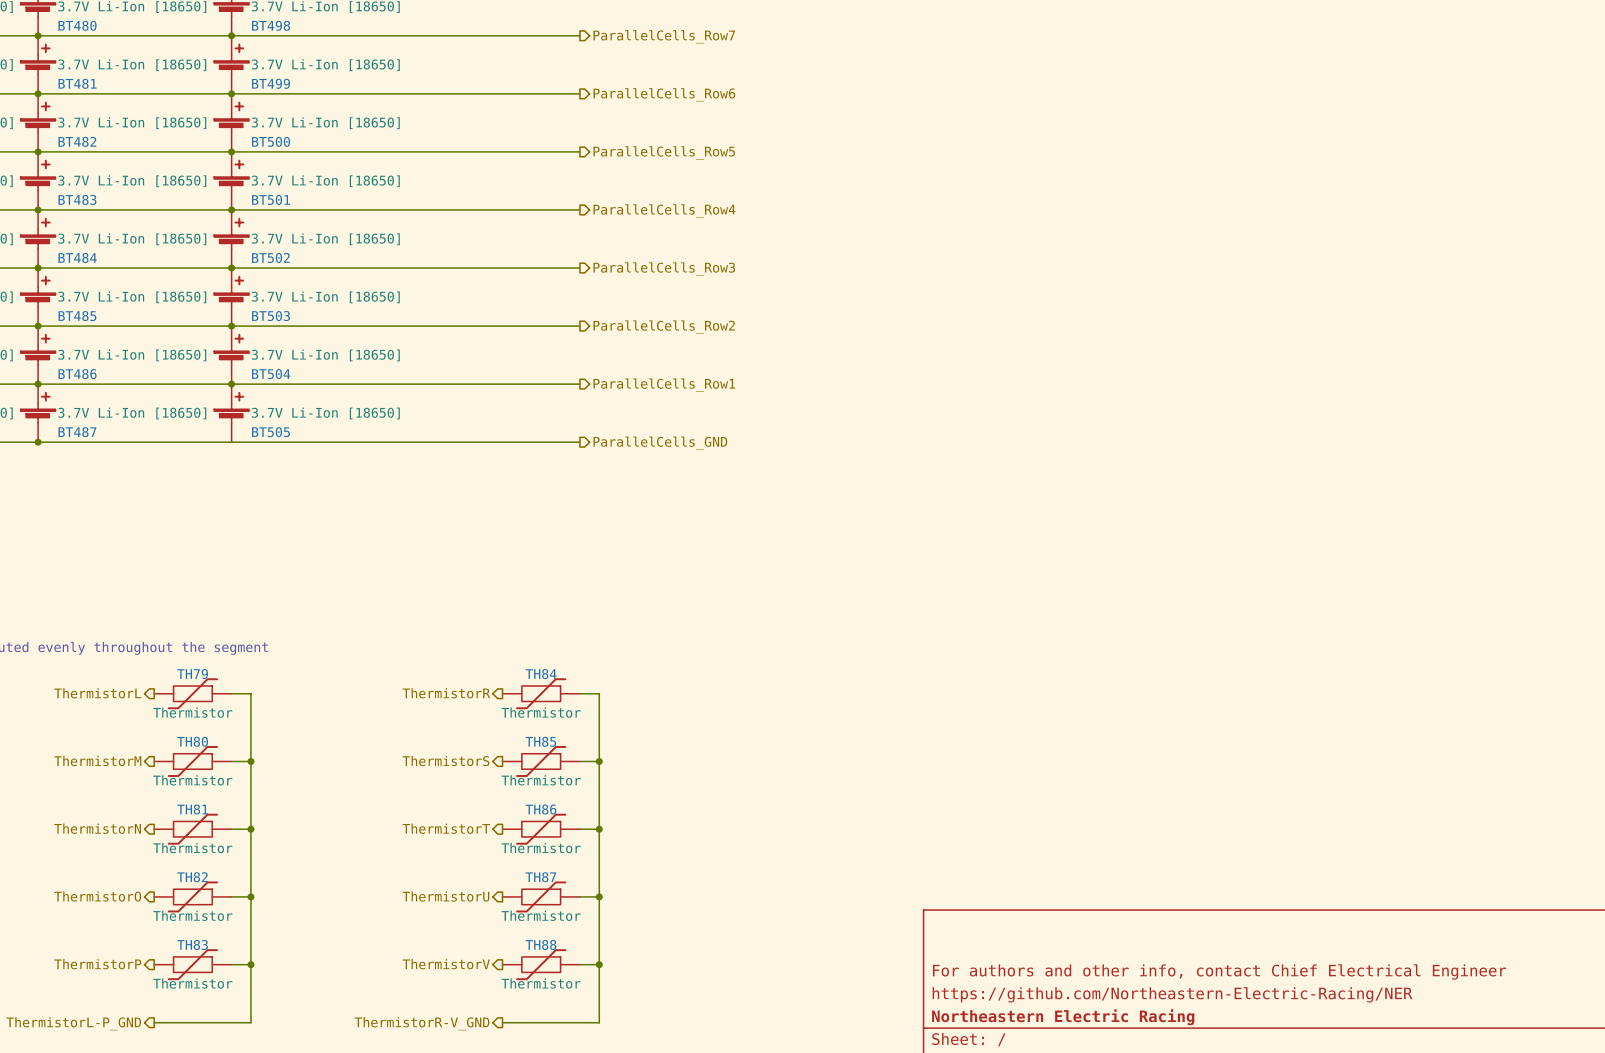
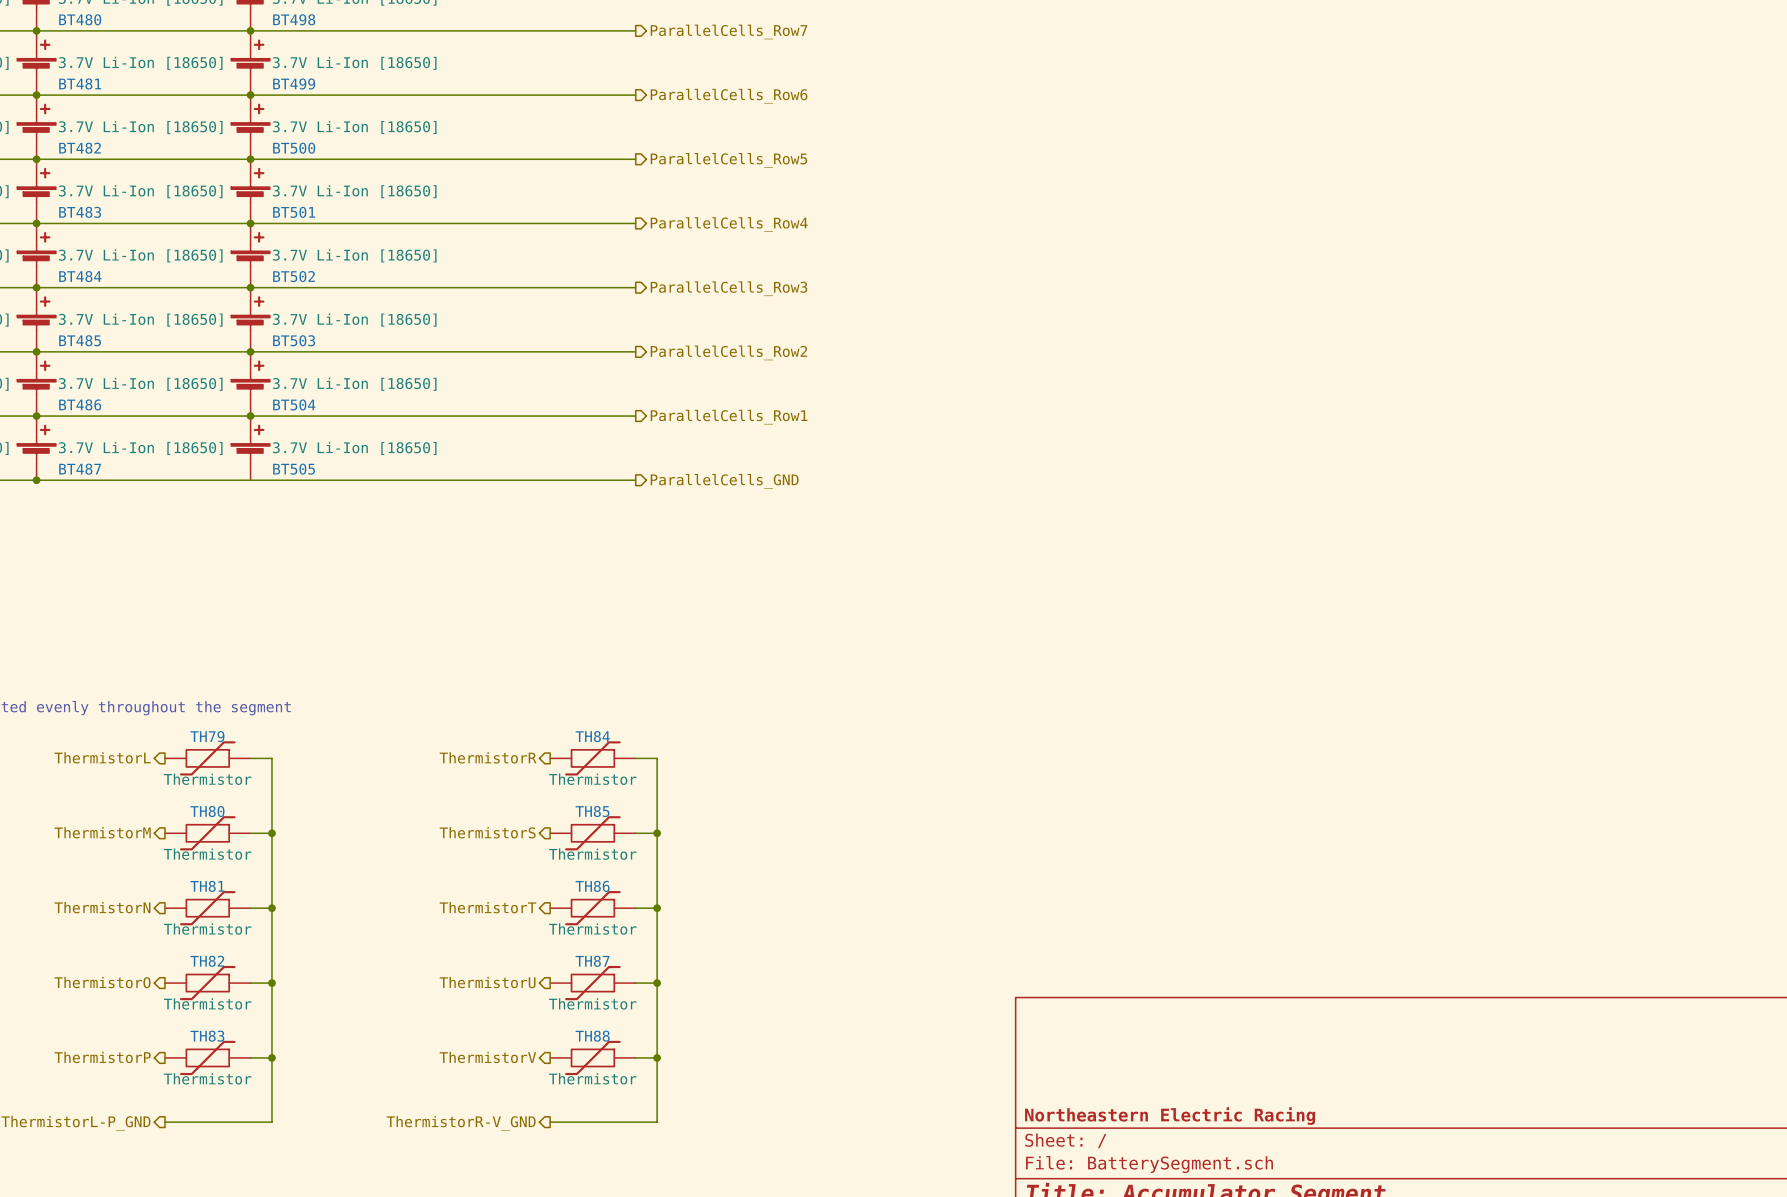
title block: For authors and other info, contact Chief Electrical Engineer (1219, 971) -> none
title block: https://github.com/Northeastern-Electric-Racing/NER (1172, 994) -> none

